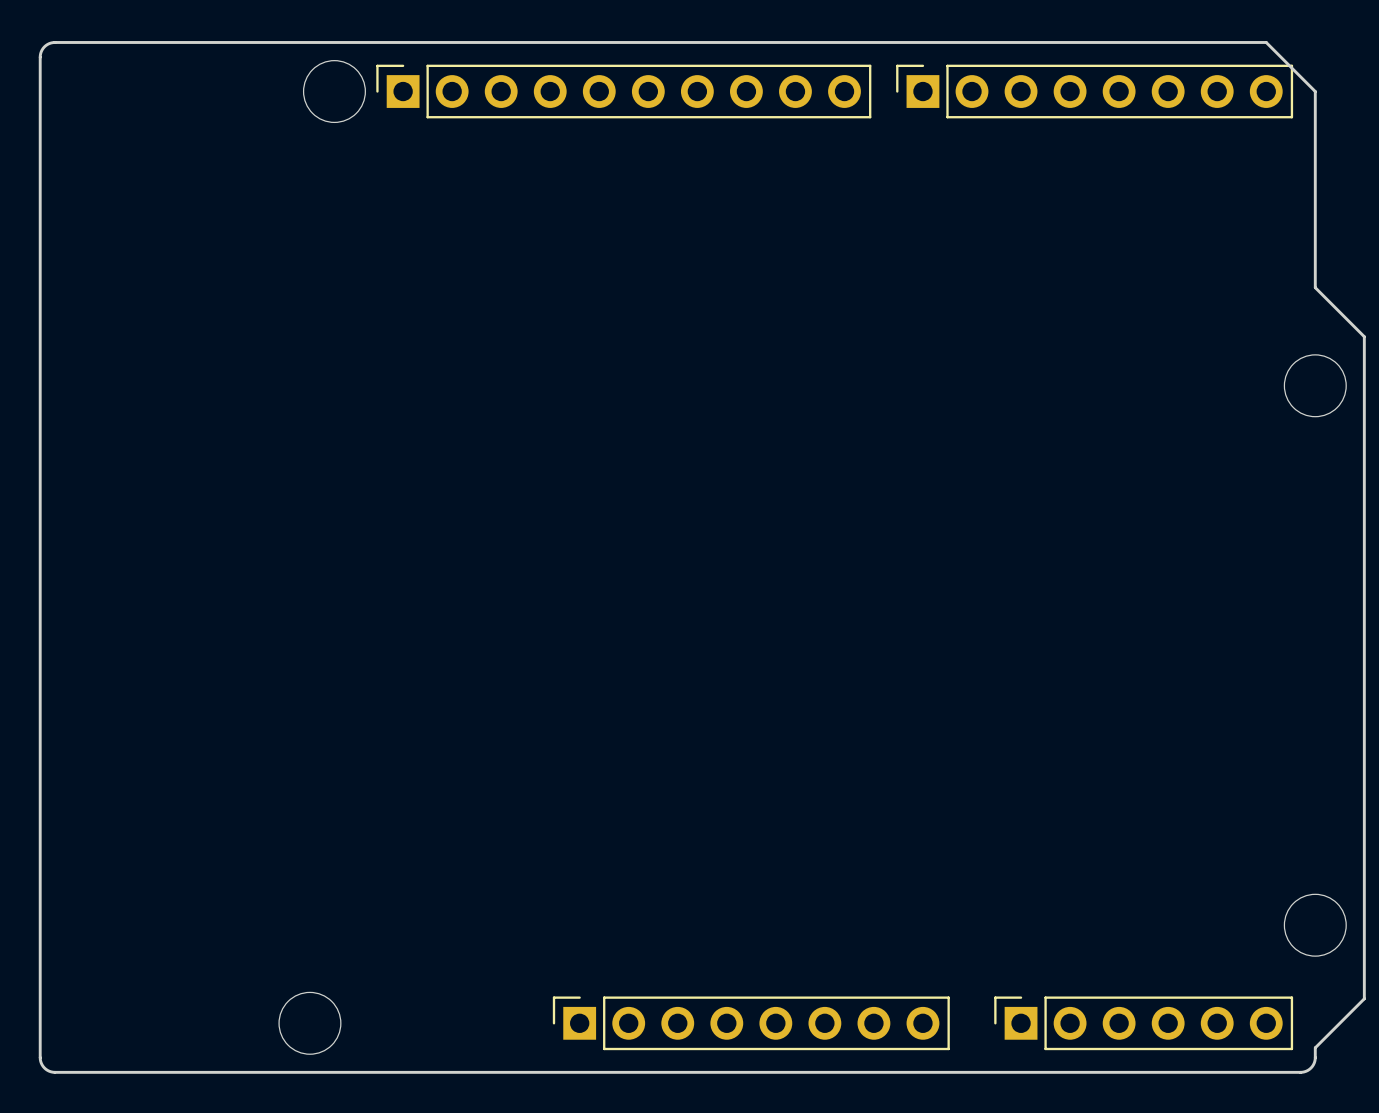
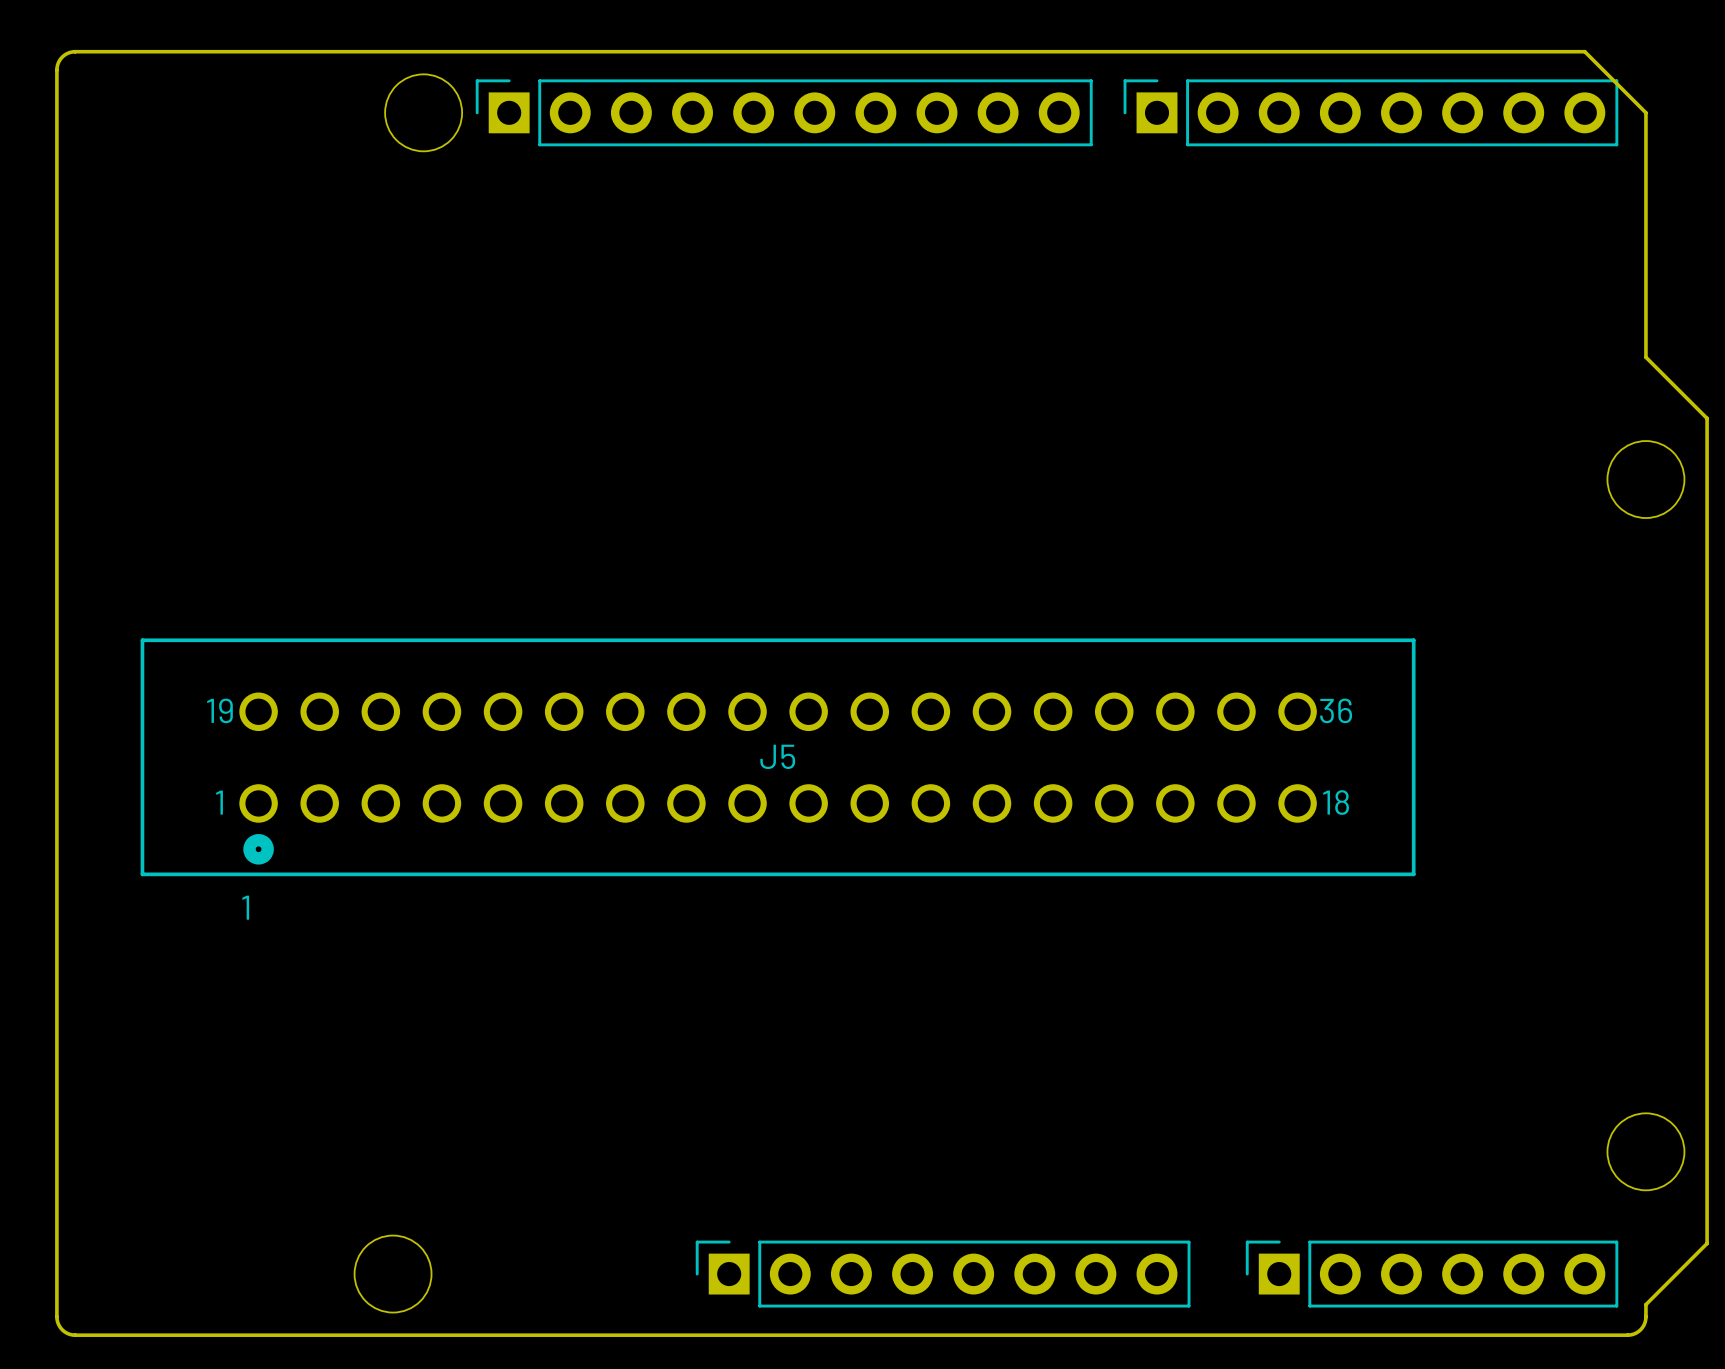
J5: none -> (778, 757)
text: none -> 1 (245, 907)

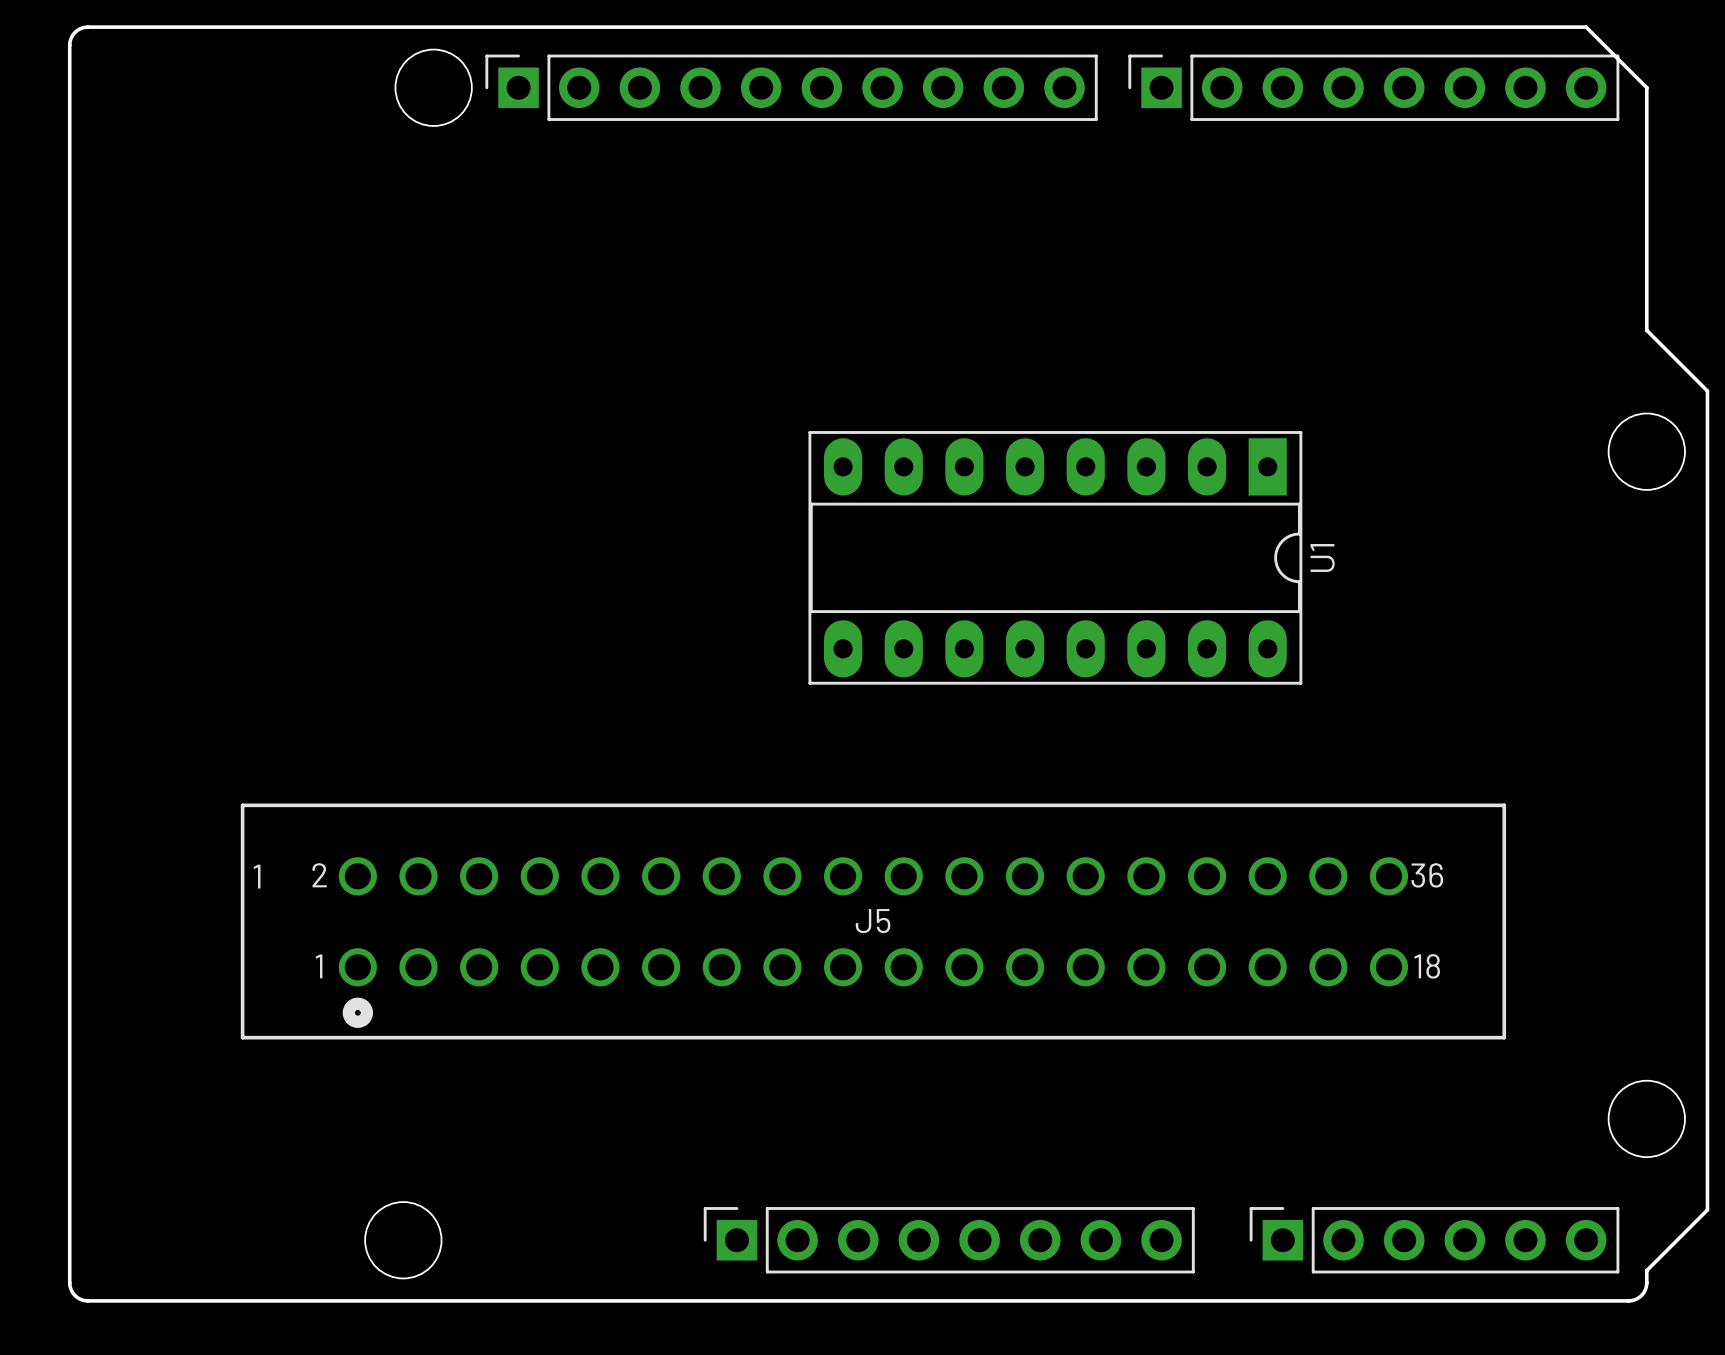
U1: none -> (1055, 557)
J5 text: 19 (219, 710) -> 2 (319, 875)
J5 position: (778, 757) -> (873, 921)

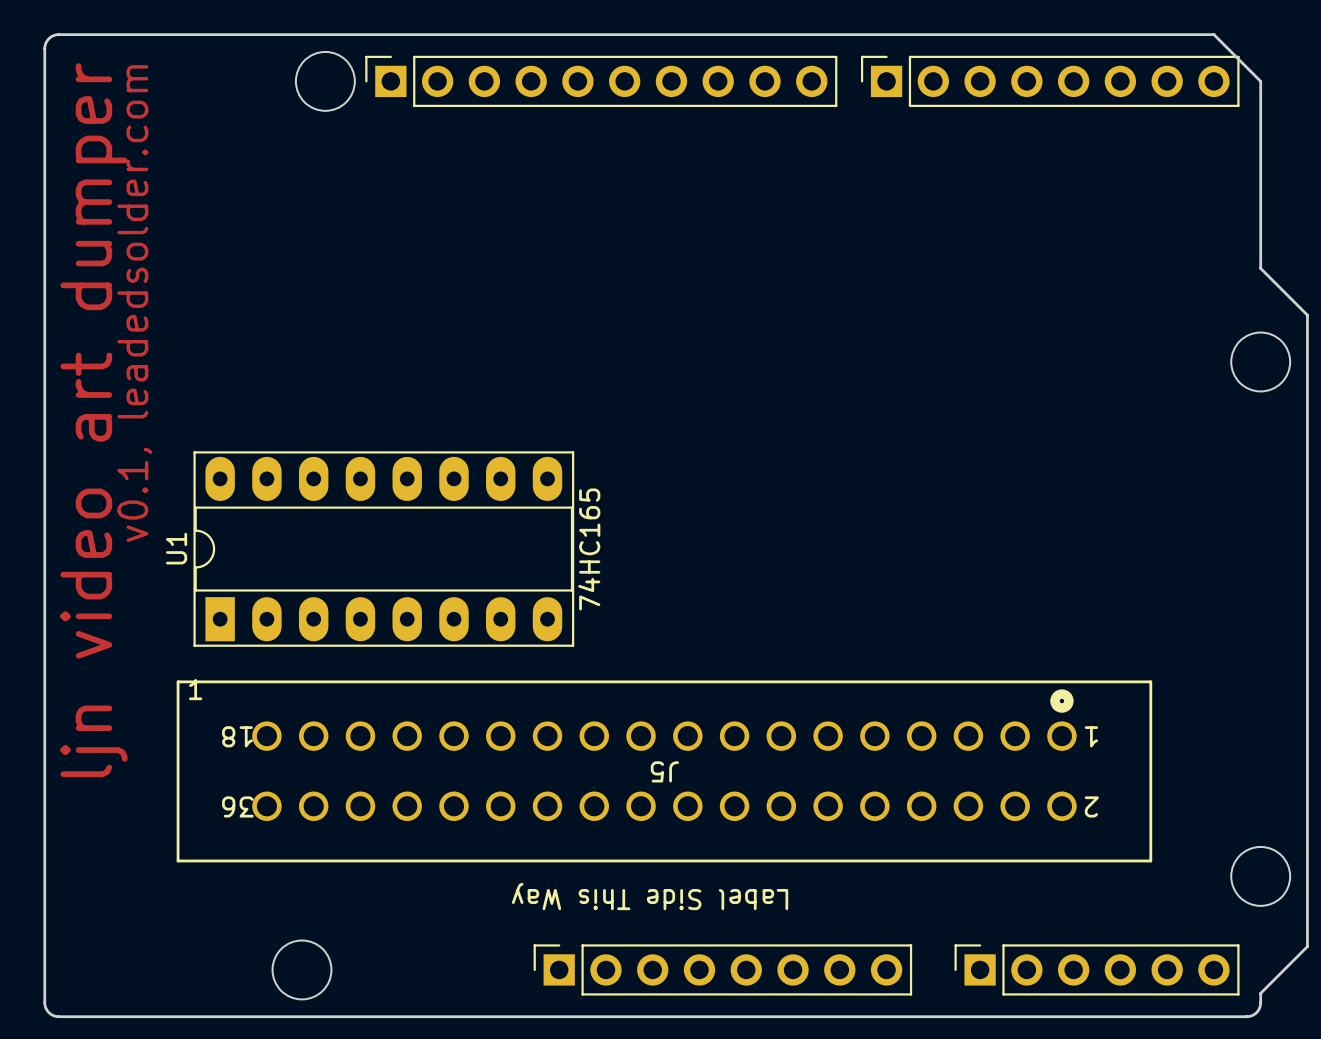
text: none -> v0.1, leadedsolder.com (134, 303)
text: none -> ljn video art dumper (93, 420)
U1 rotation: 0° (1055, 557) -> 180° (383, 549)
U1 position: (1055, 557) -> (383, 549)
U1 value: none -> 74HC165 (589, 549)
J5 rotation: 0° (873, 921) -> 180° (664, 771)
text: none -> Label Side This Way (650, 896)

